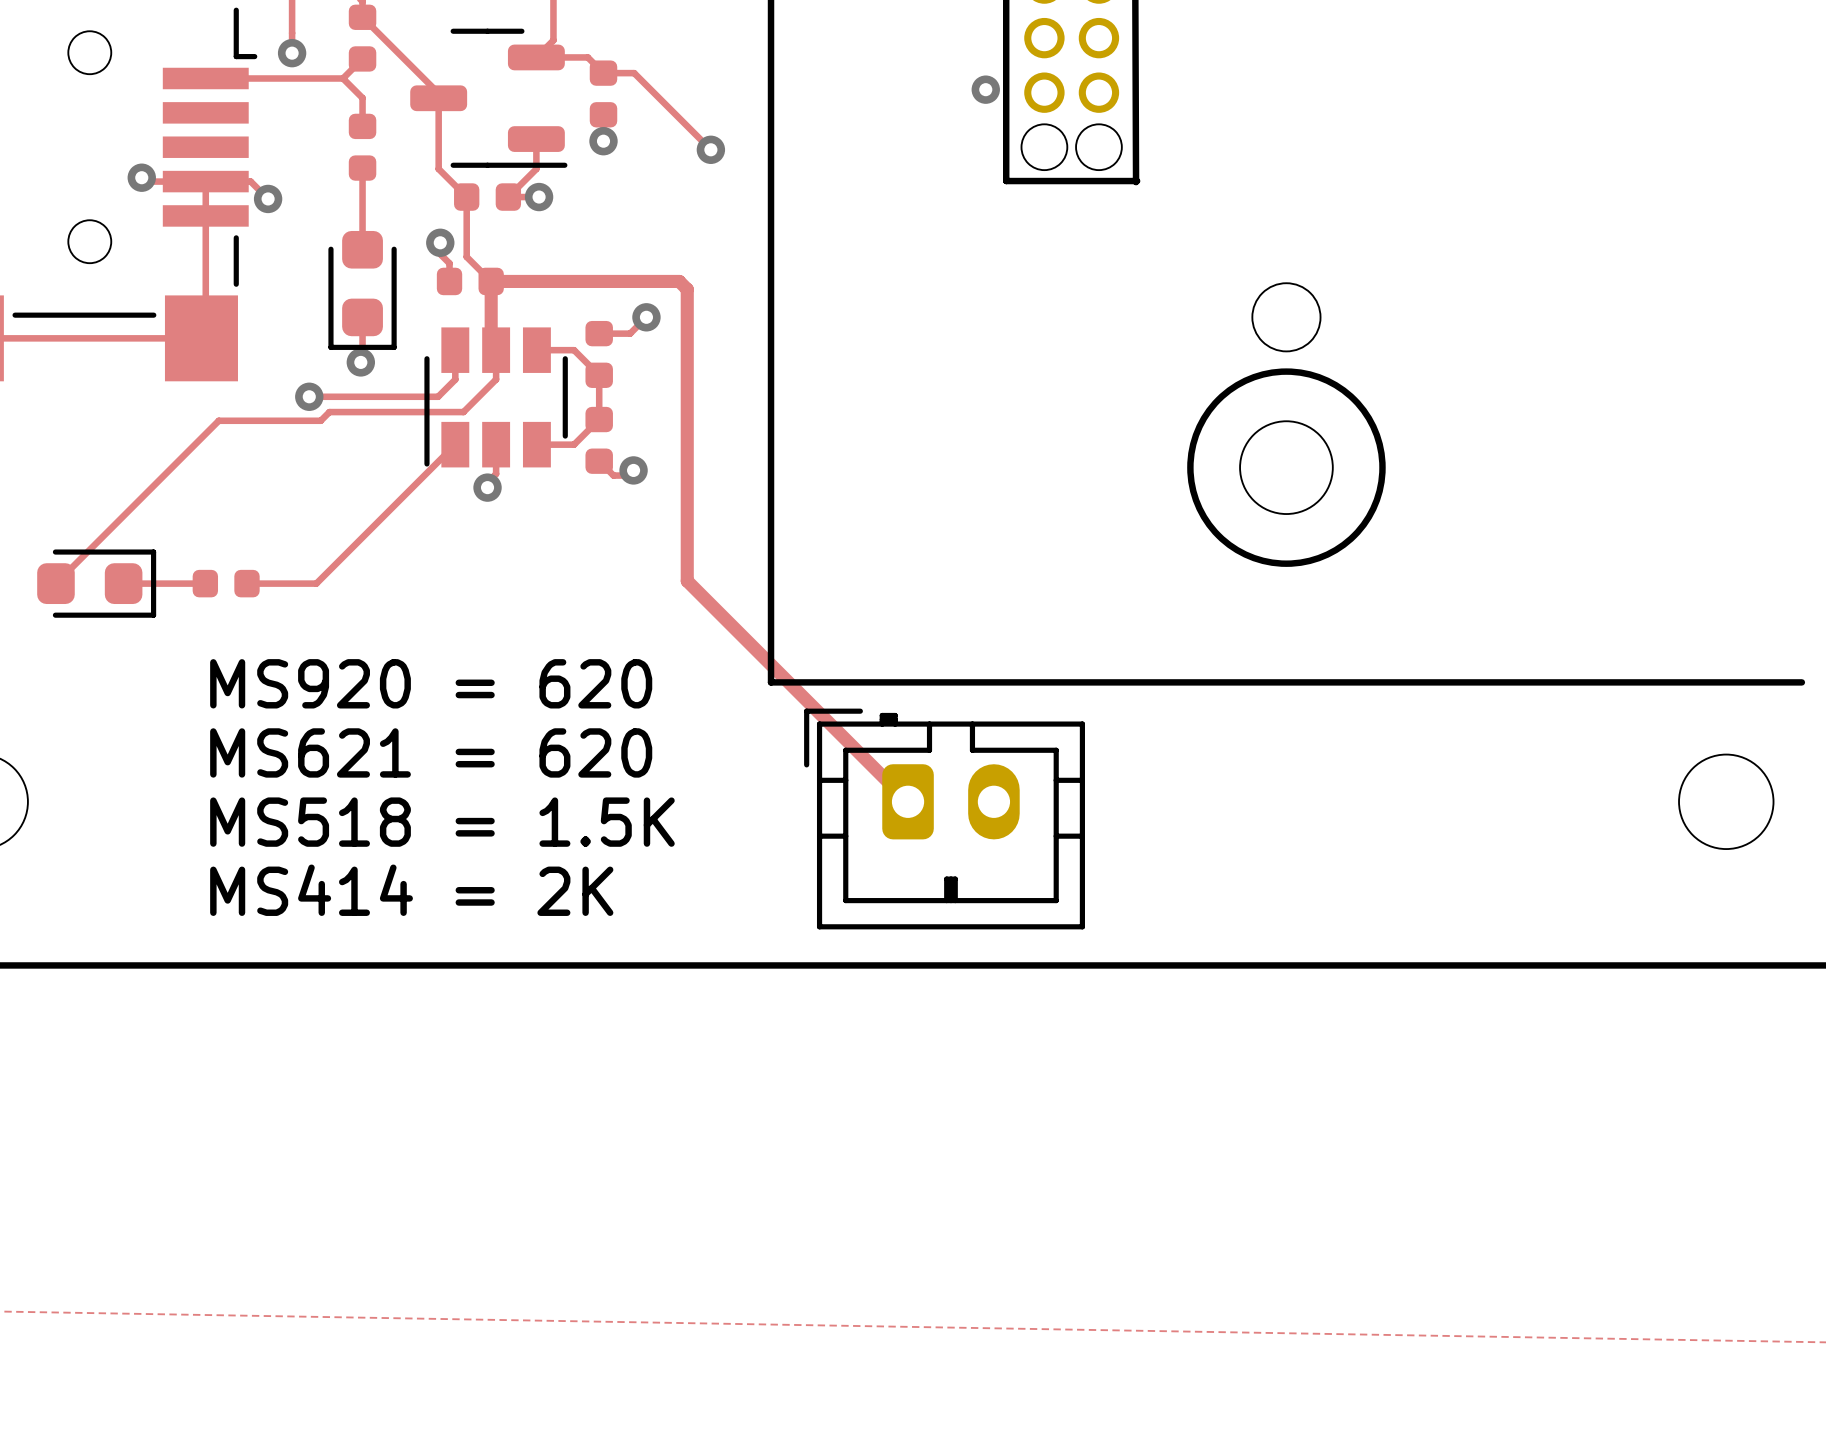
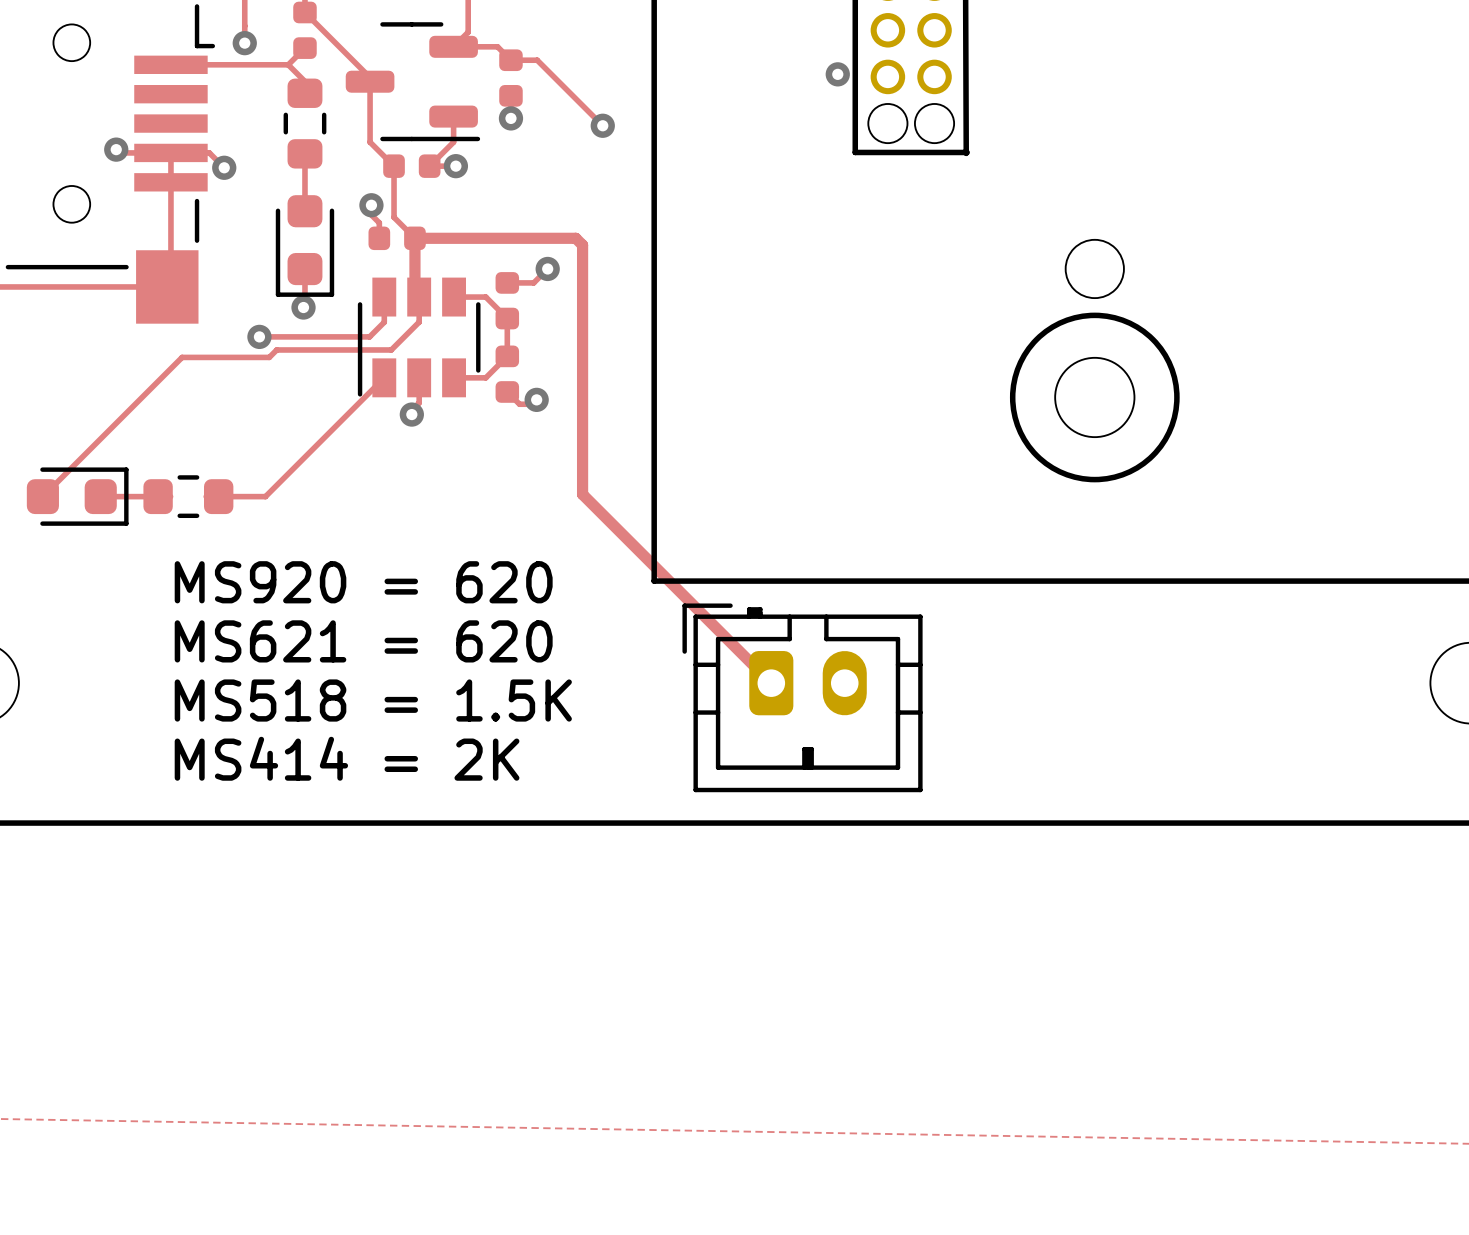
track: (362, 98) (362, 126) -> none
part footprint: [348, 113, 377, 181] -> [283, 78, 327, 169]
part footprint: [192, 569, 260, 598] -> [143, 475, 234, 519]

